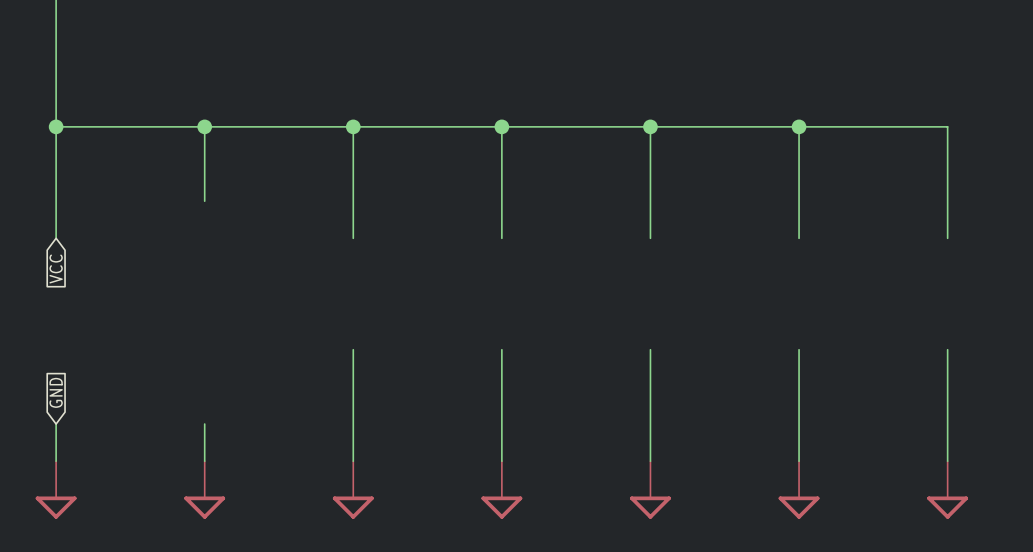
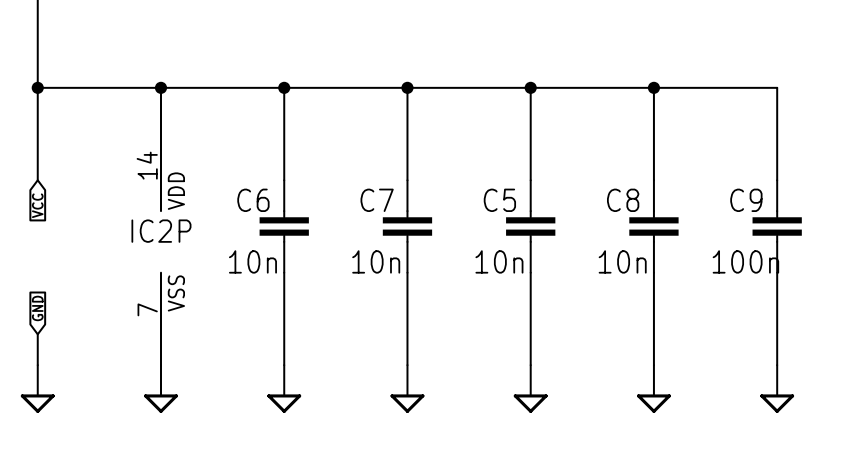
C6: none -> 10n (284, 226)
C7: none -> 10n (407, 226)
C5: none -> 10n (530, 226)
C8: none -> 10n (653, 226)
C9: none -> 100n (777, 226)
IC2P: none -> (161, 241)

